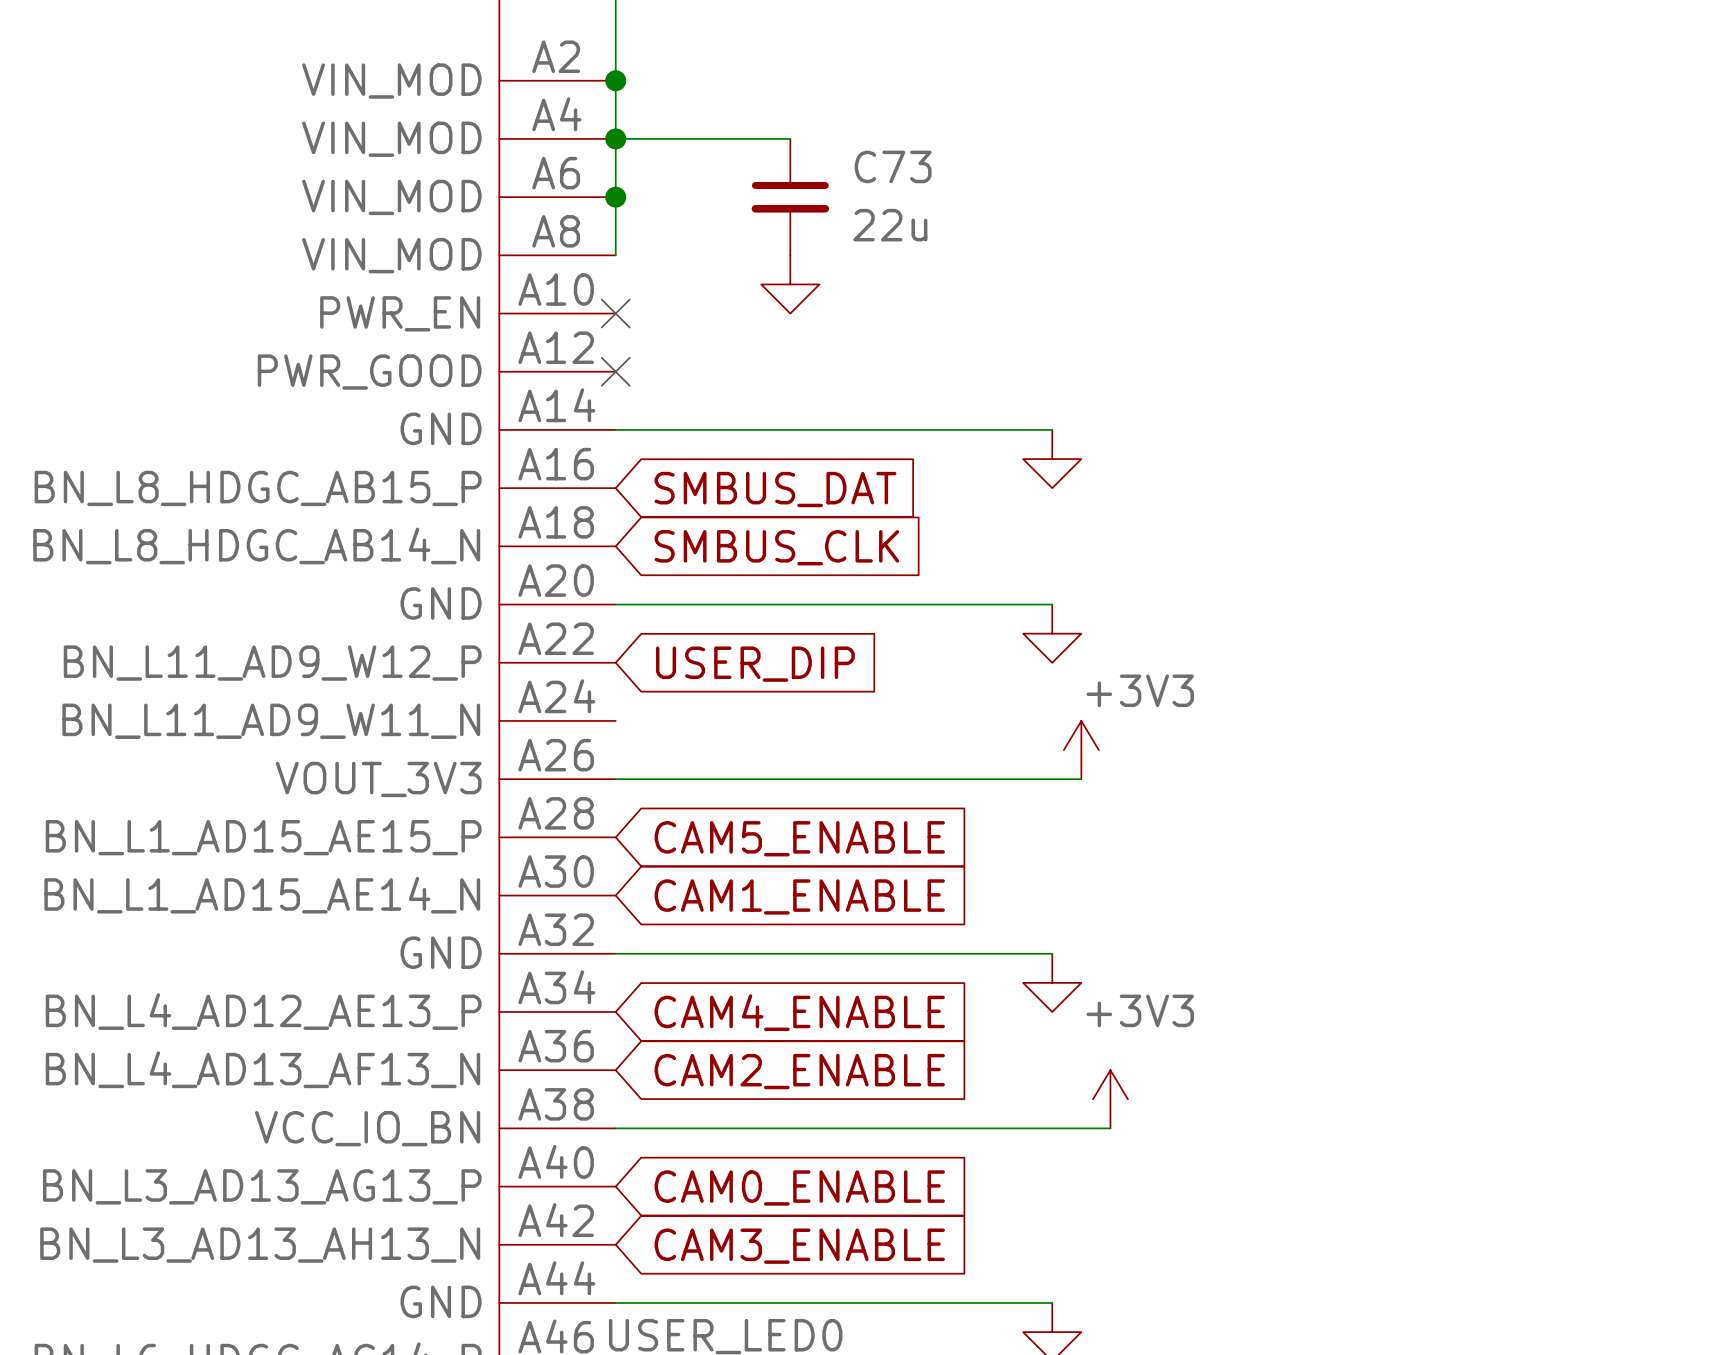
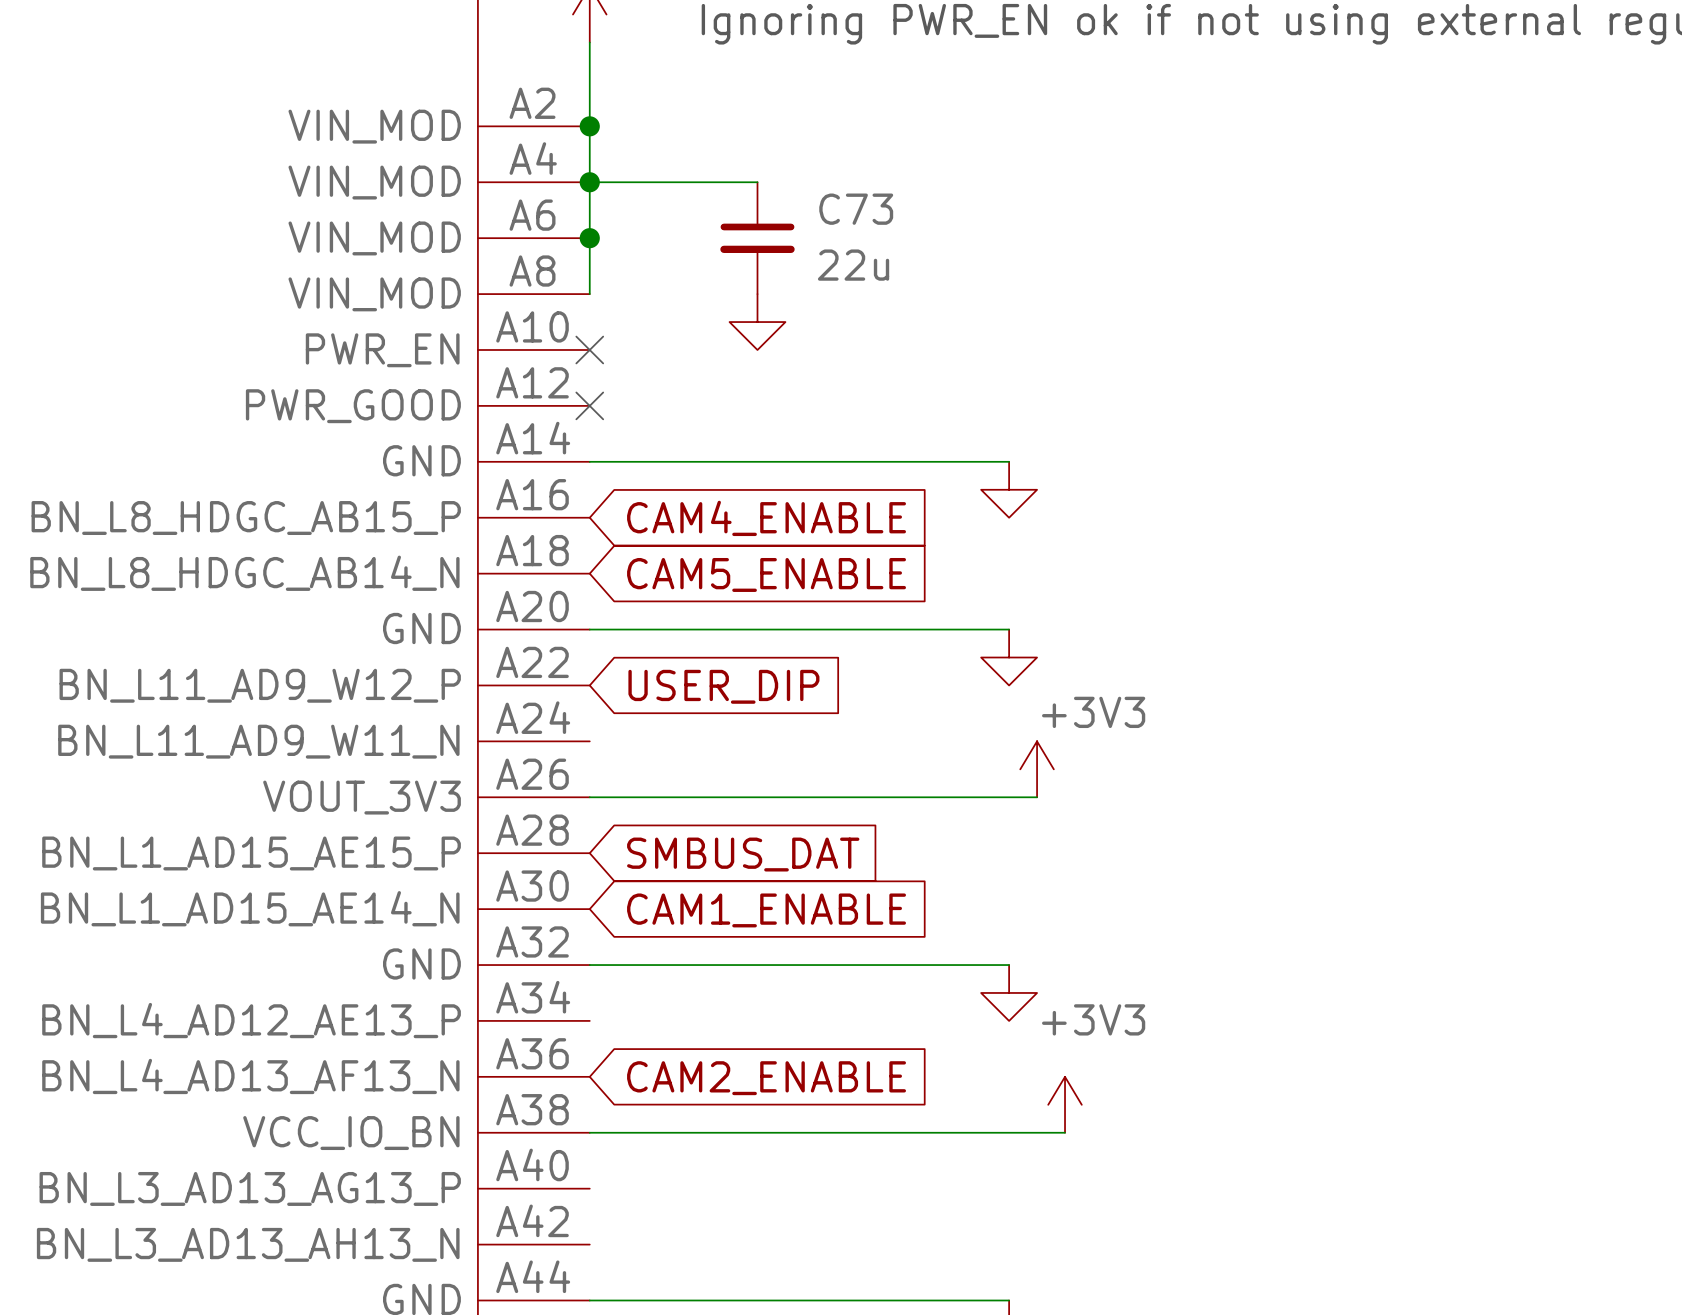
global label: SMBUS_DAT (775, 489) -> CAM4_ENABLE (766, 518)
global label: SMBUS_CLK (776, 547) -> CAM5_ENABLE (766, 574)
global label: CAM5_ENABLE (799, 838) -> SMBUS_DAT (743, 854)
global label: CAM4_ENABLE (799, 1012) -> none
global label: CAM0_ENABLE (799, 1187) -> none
global label: CAM3_ENABLE (799, 1246) -> none

